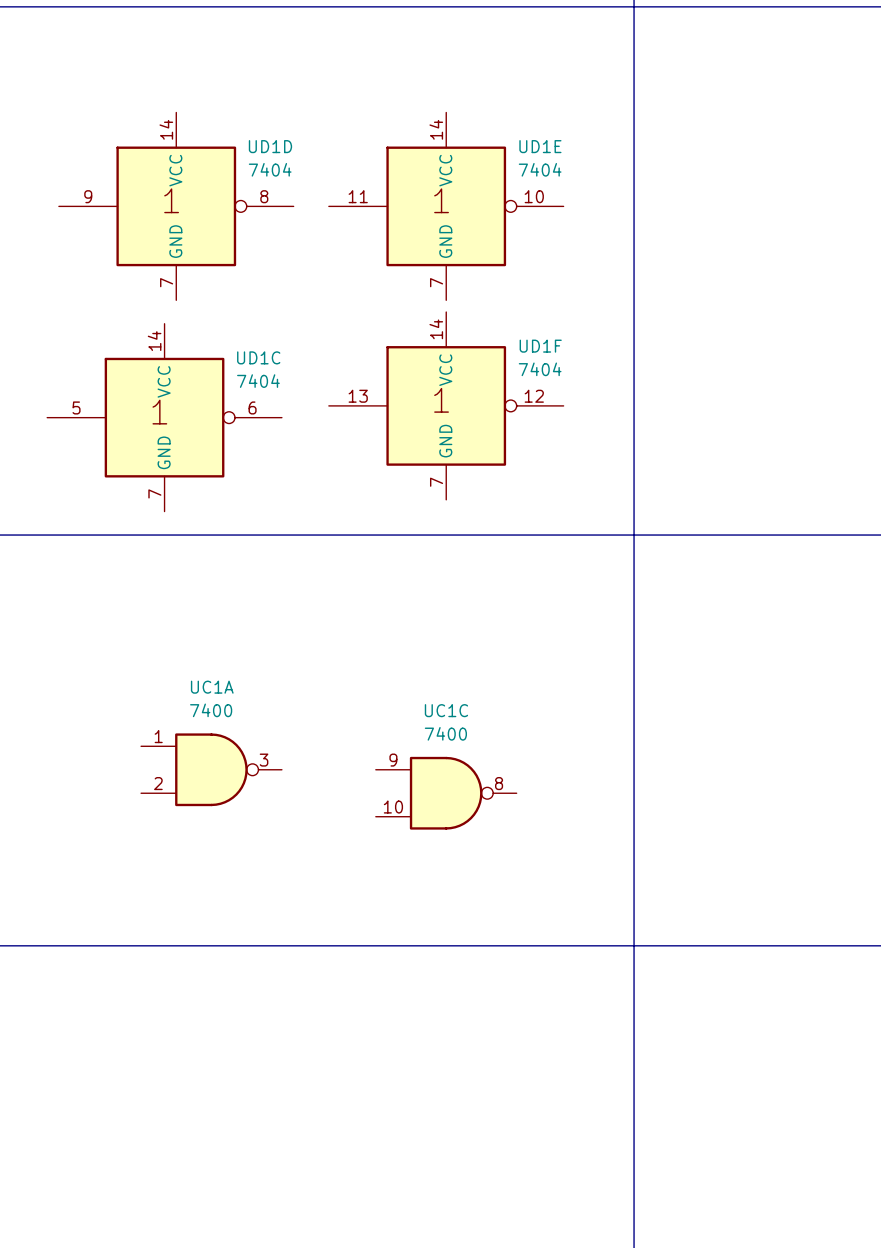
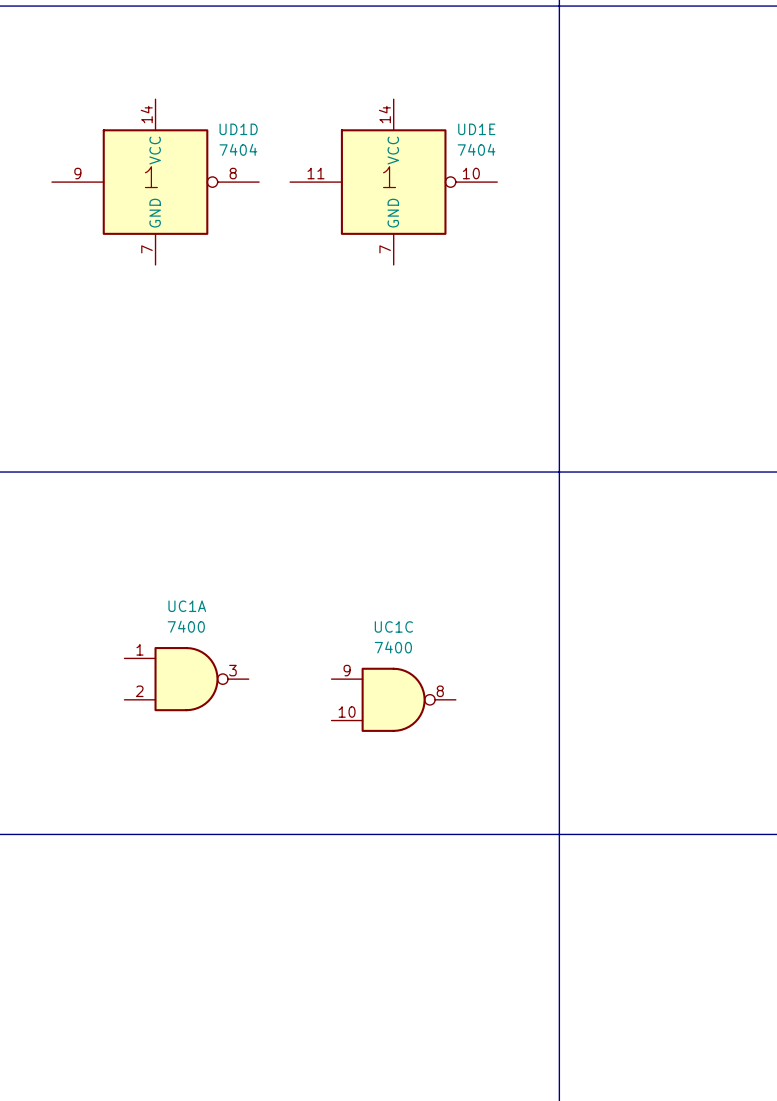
UD1F: 7404 (446, 405) -> none
UD1C: 7404 (164, 417) -> none

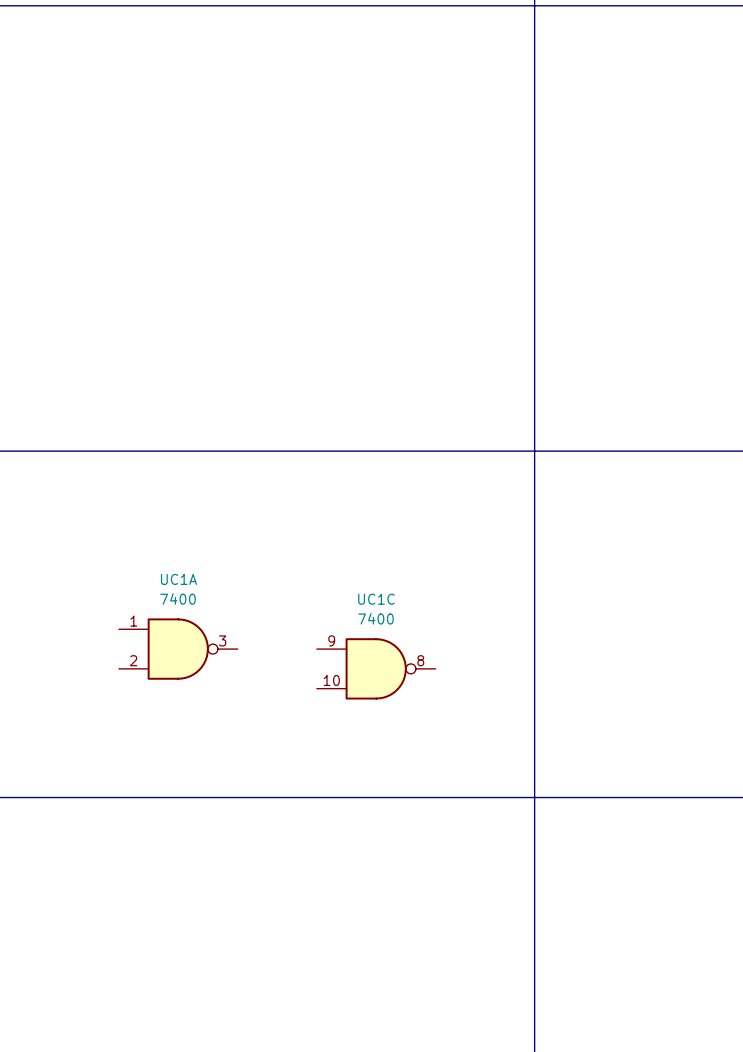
UD1D: 7404 (155, 182) -> none
UD1E: 7404 (393, 182) -> none

